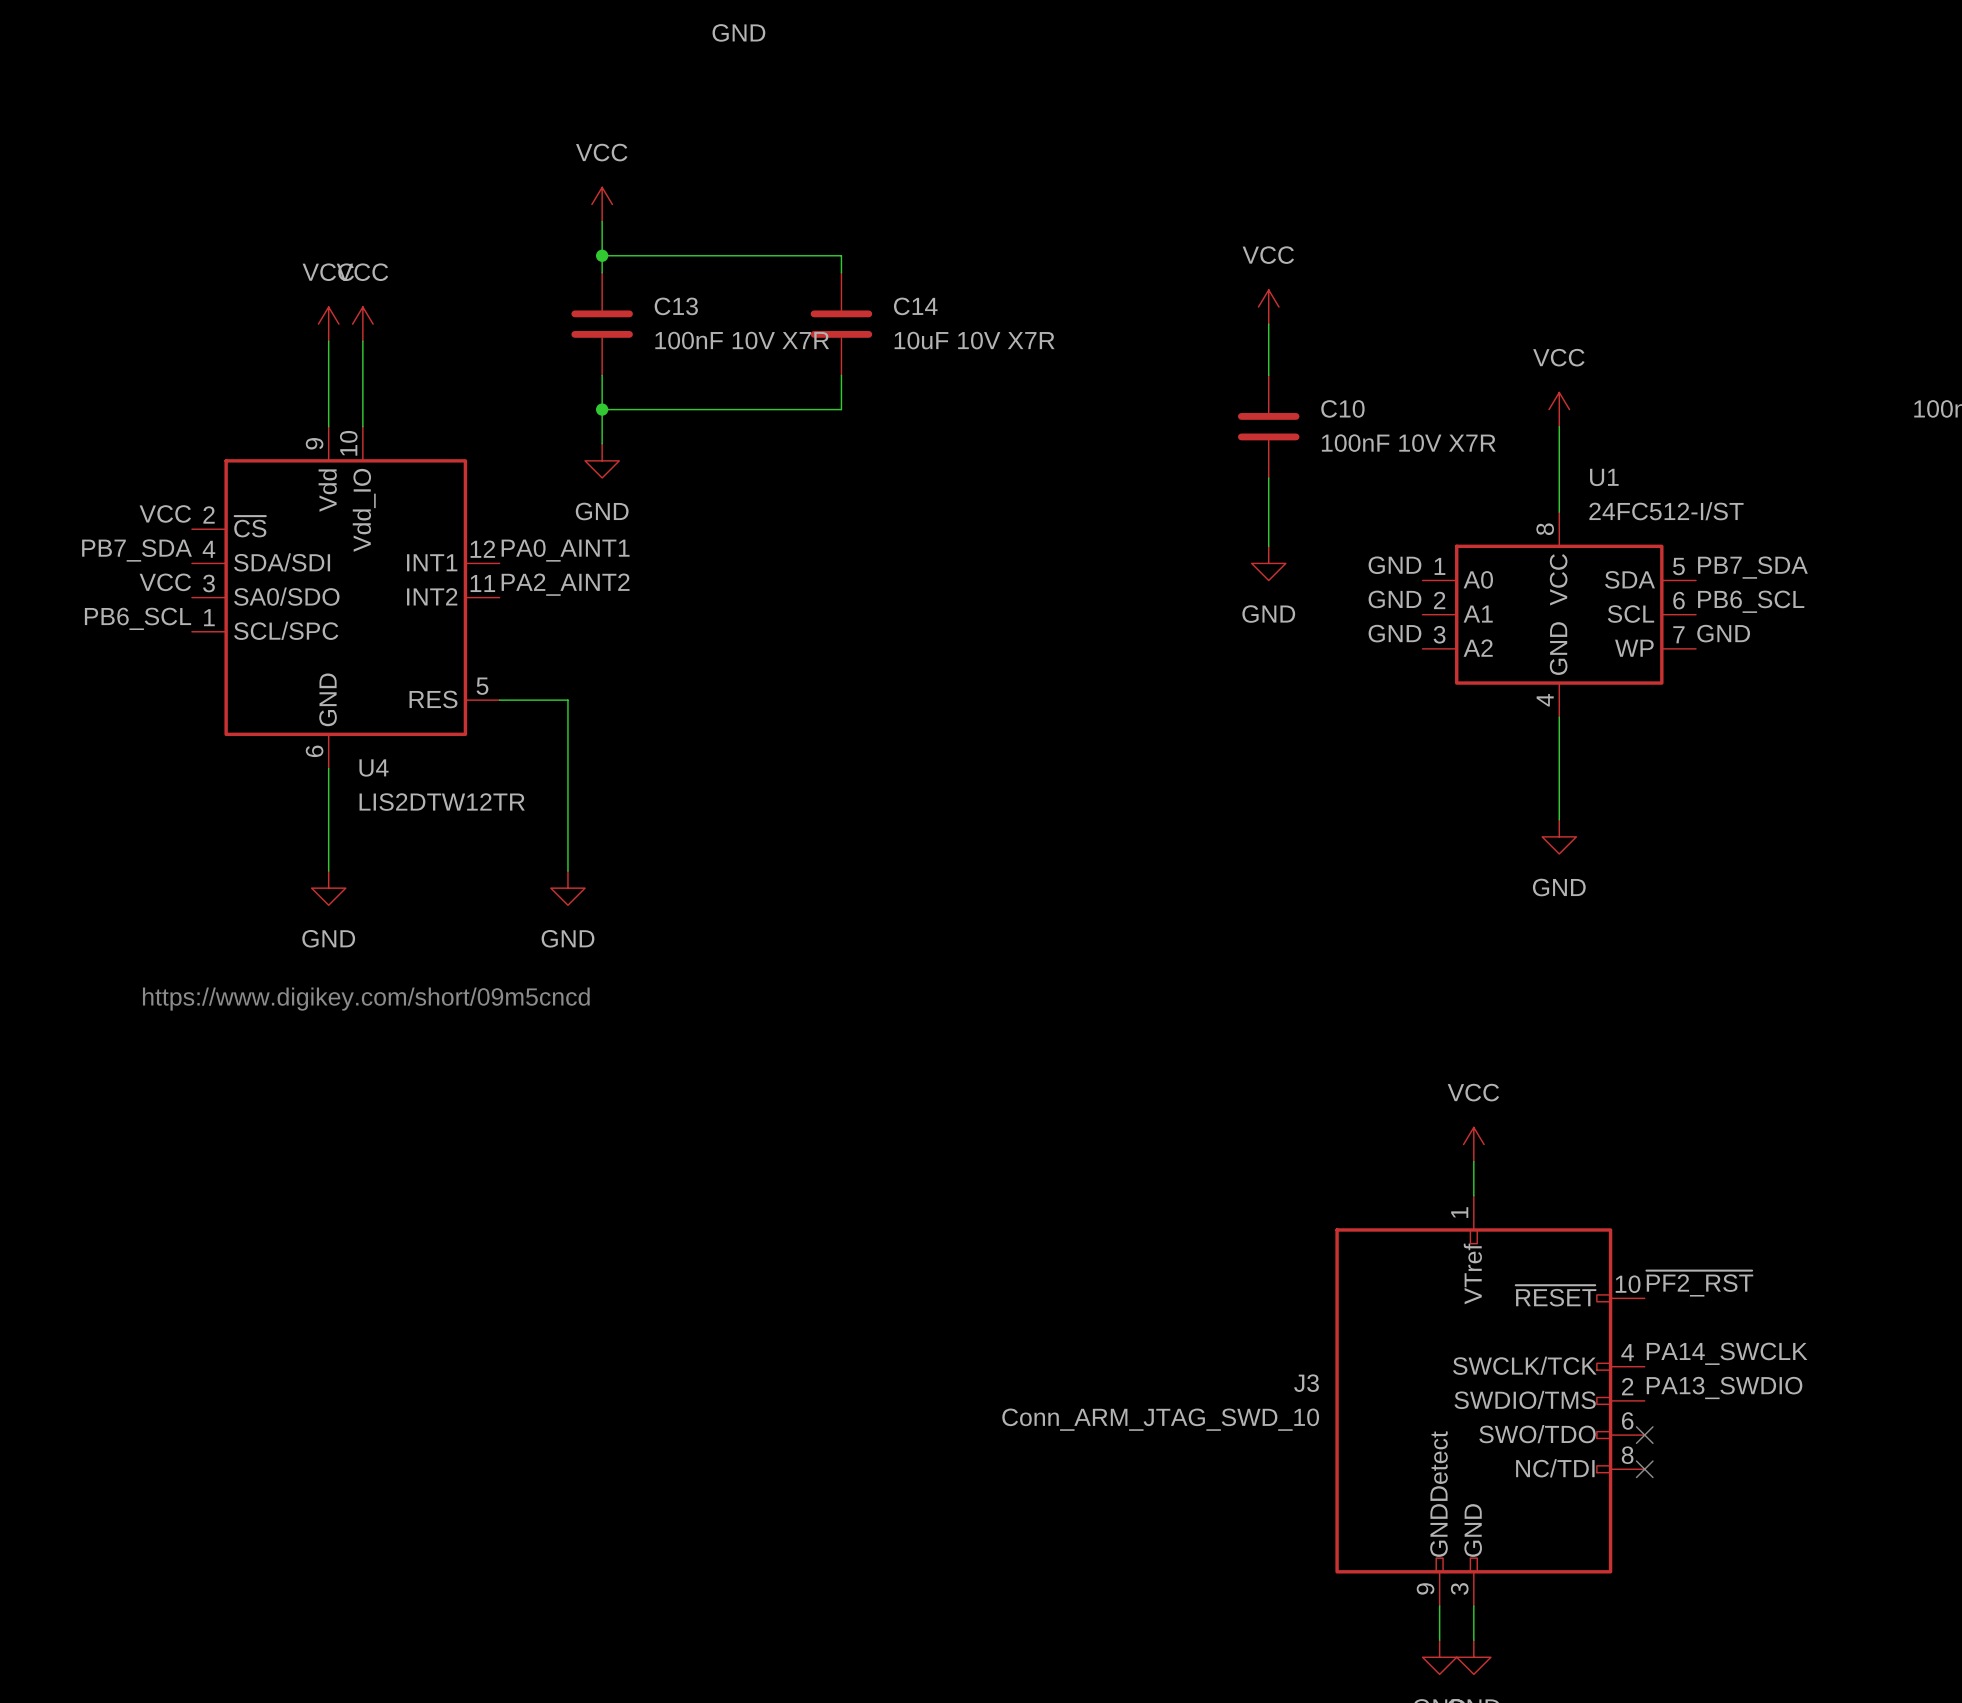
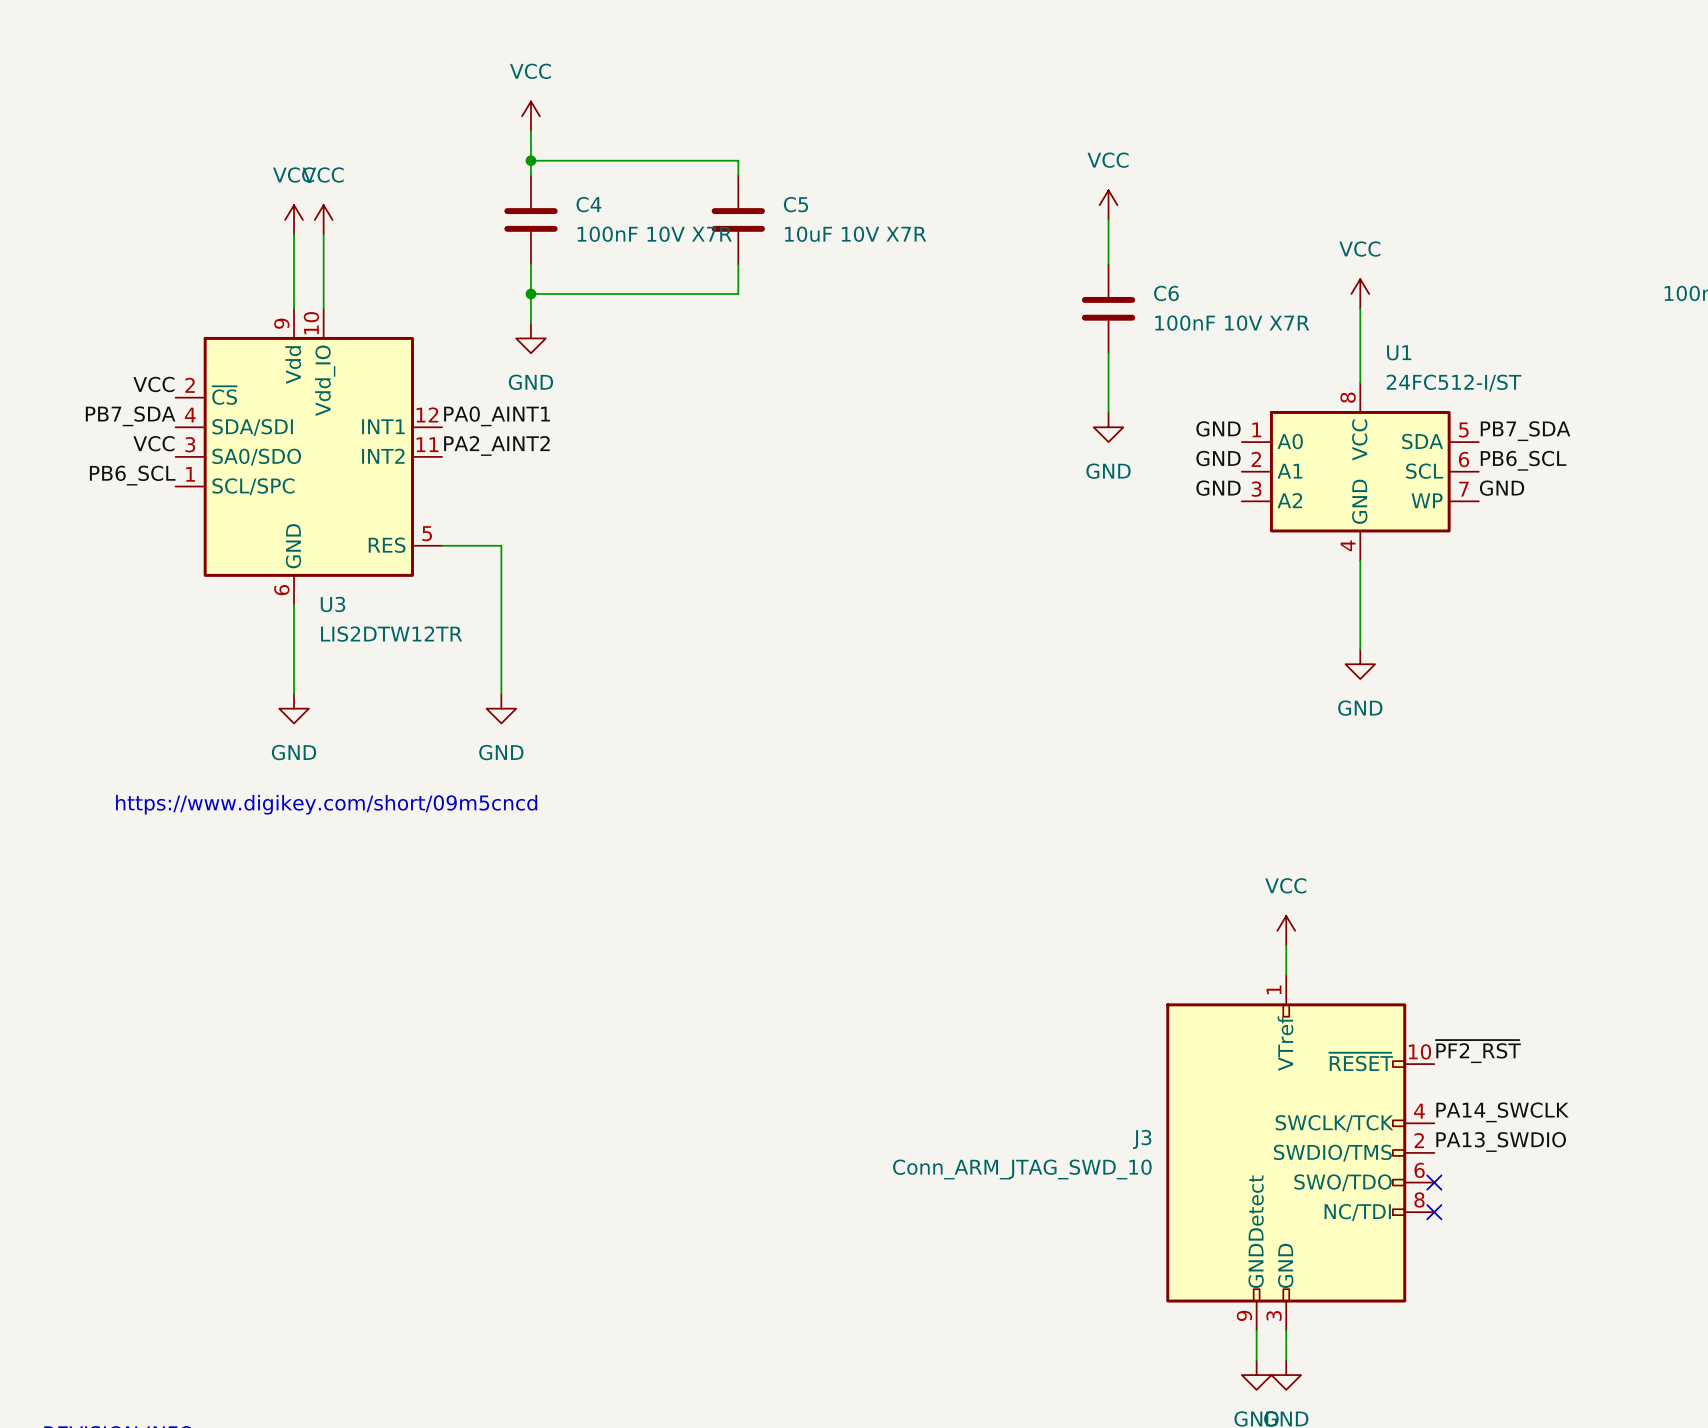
C13 name: C13 (676, 306) -> C4 (588, 204)
C14 name: C14 (915, 306) -> C5 (795, 204)
C10 name: C10 (1342, 408) -> C6 (1166, 293)
U4 name: U4 (374, 767) -> U3 (332, 604)

